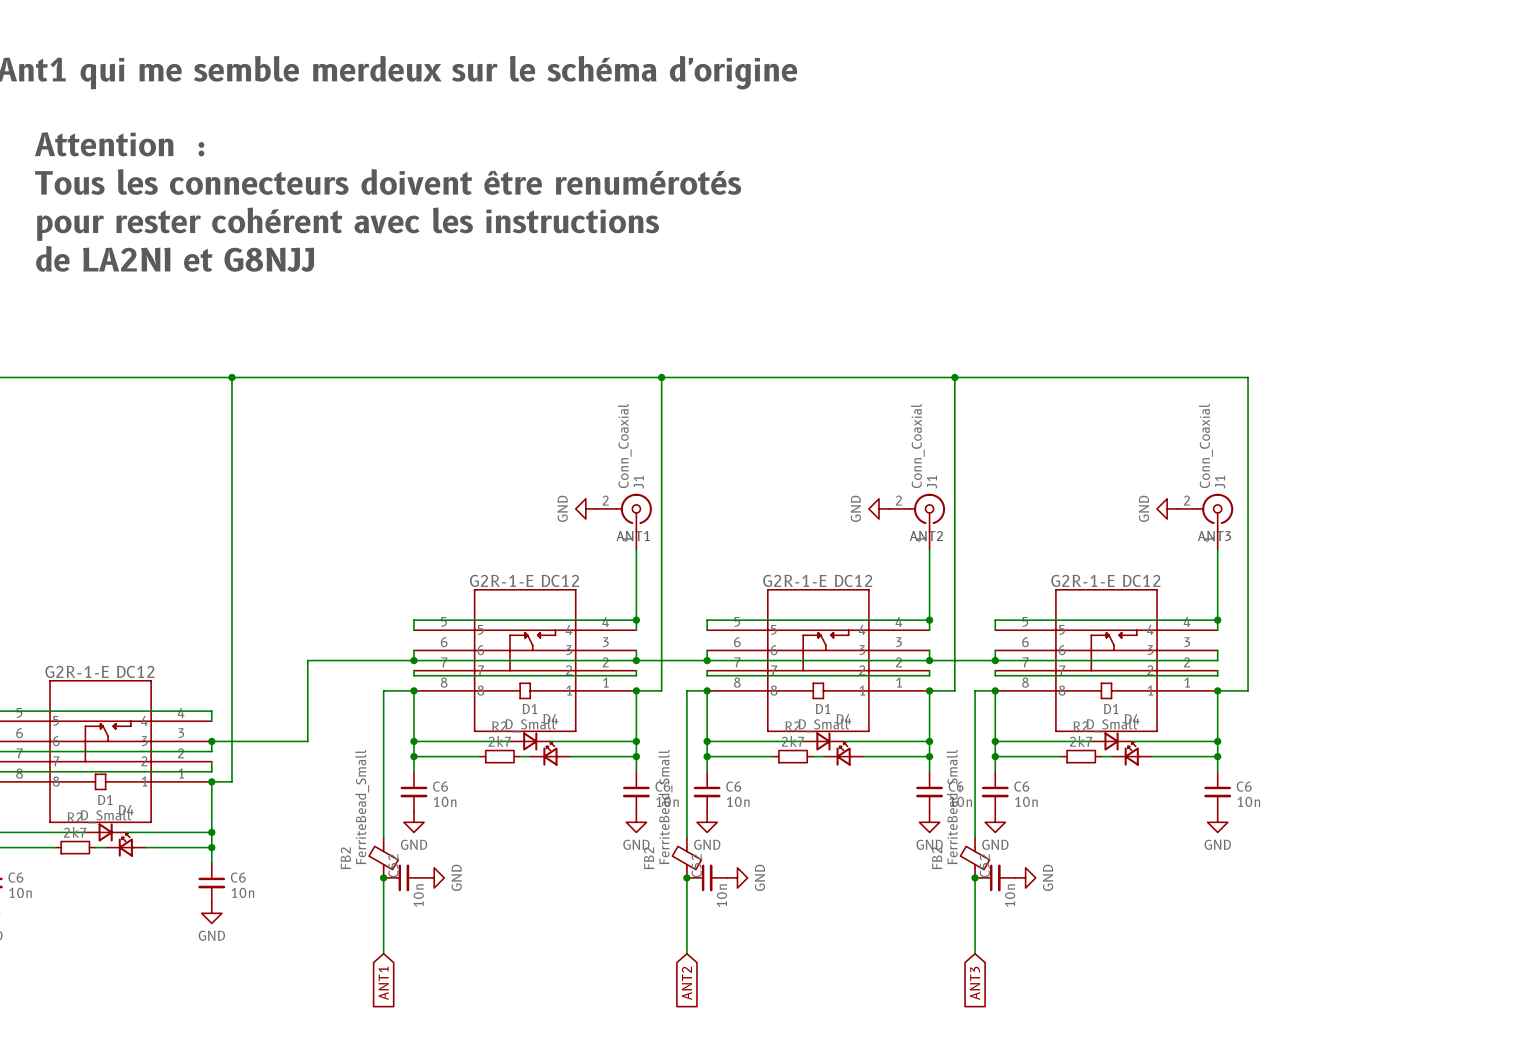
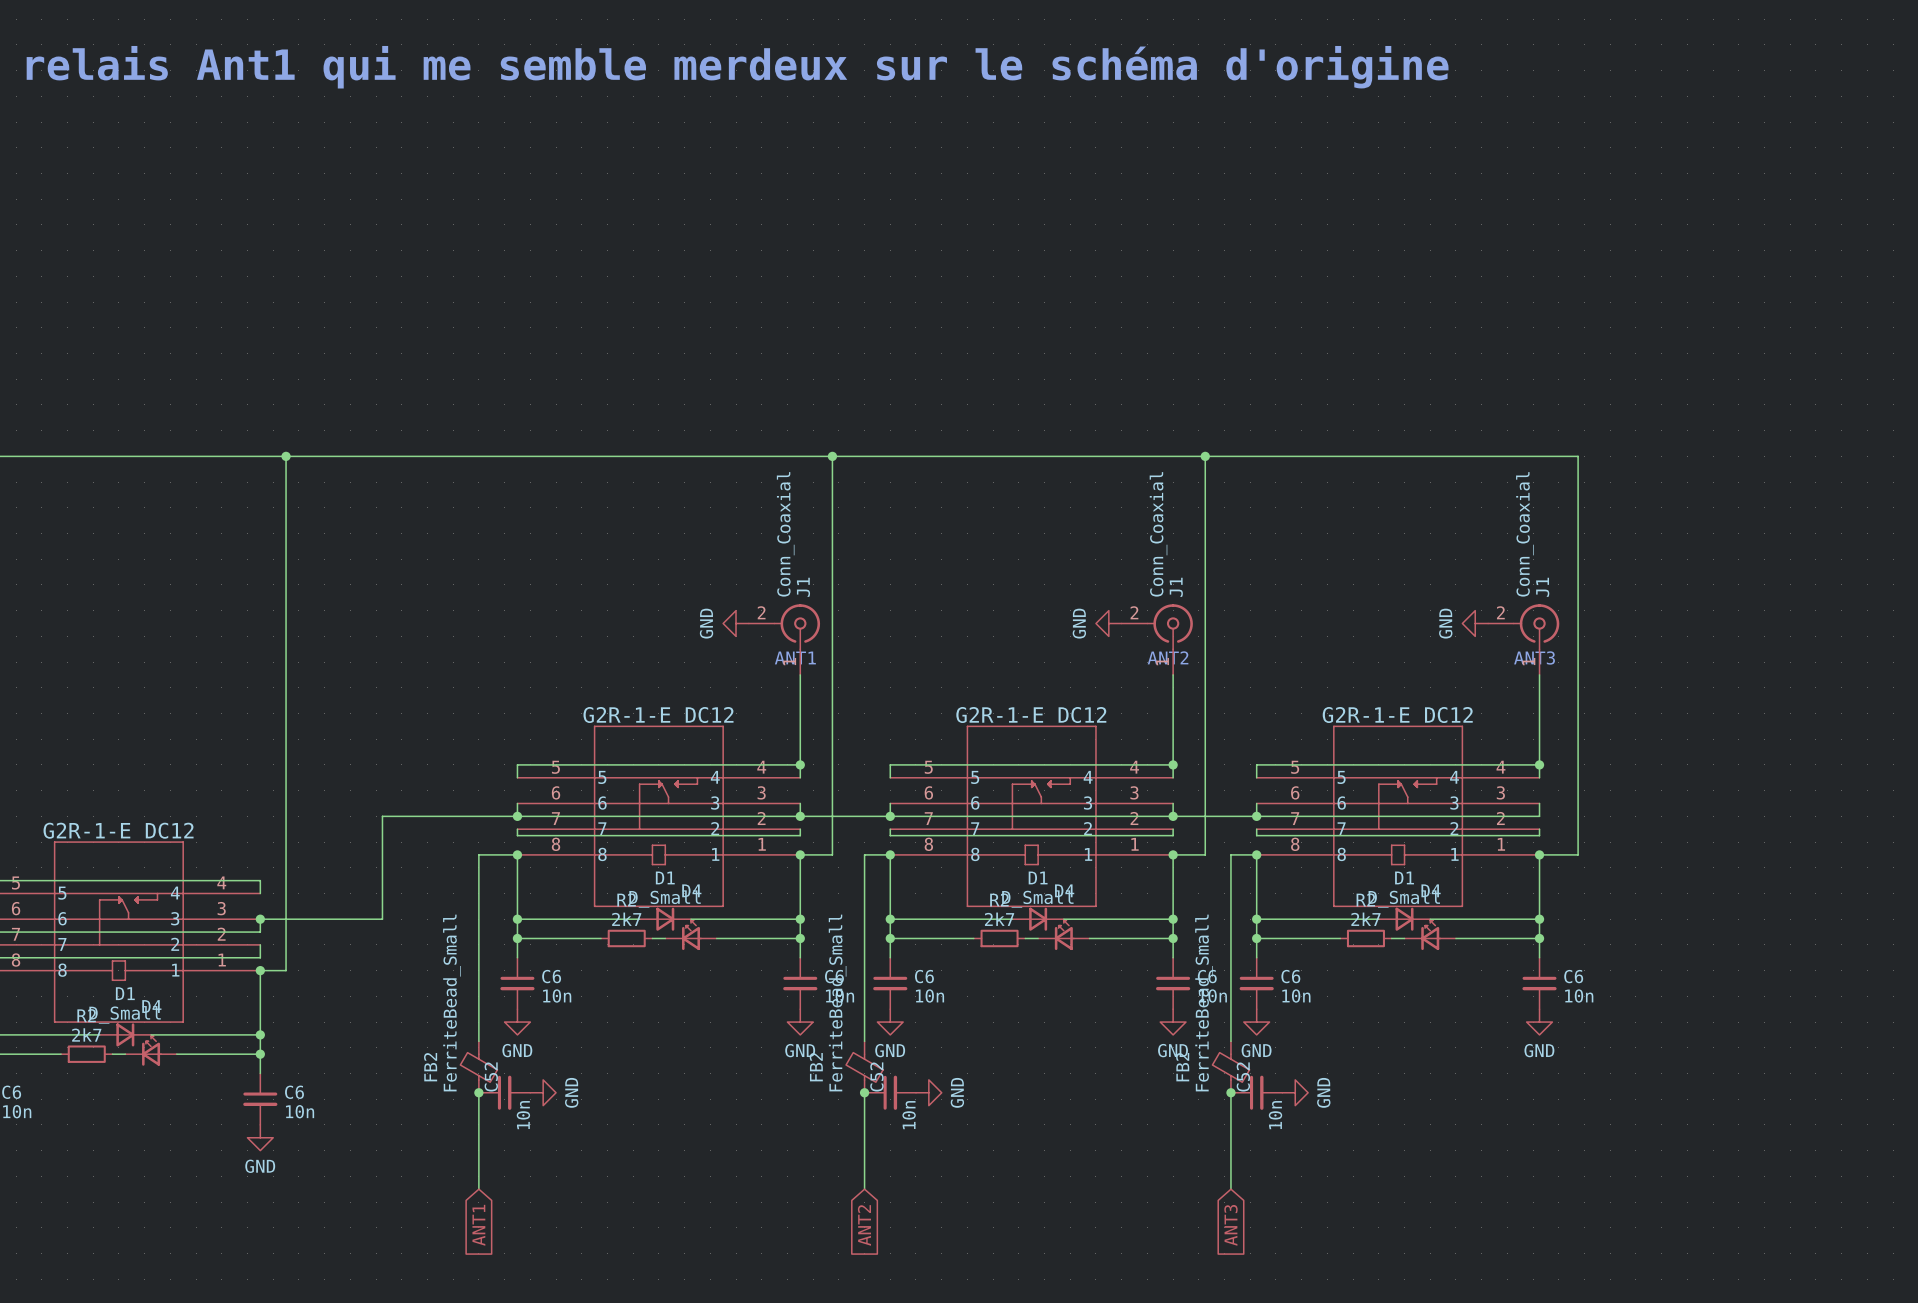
text: Attention : (119, 144) -> none
text: Tous les connecteurs doivent être renumérotés (388, 182) -> none
text: pour rester cohérent avec les instructions (348, 224) -> none
text: de LA2NI et G8NJJ (175, 258) -> none

